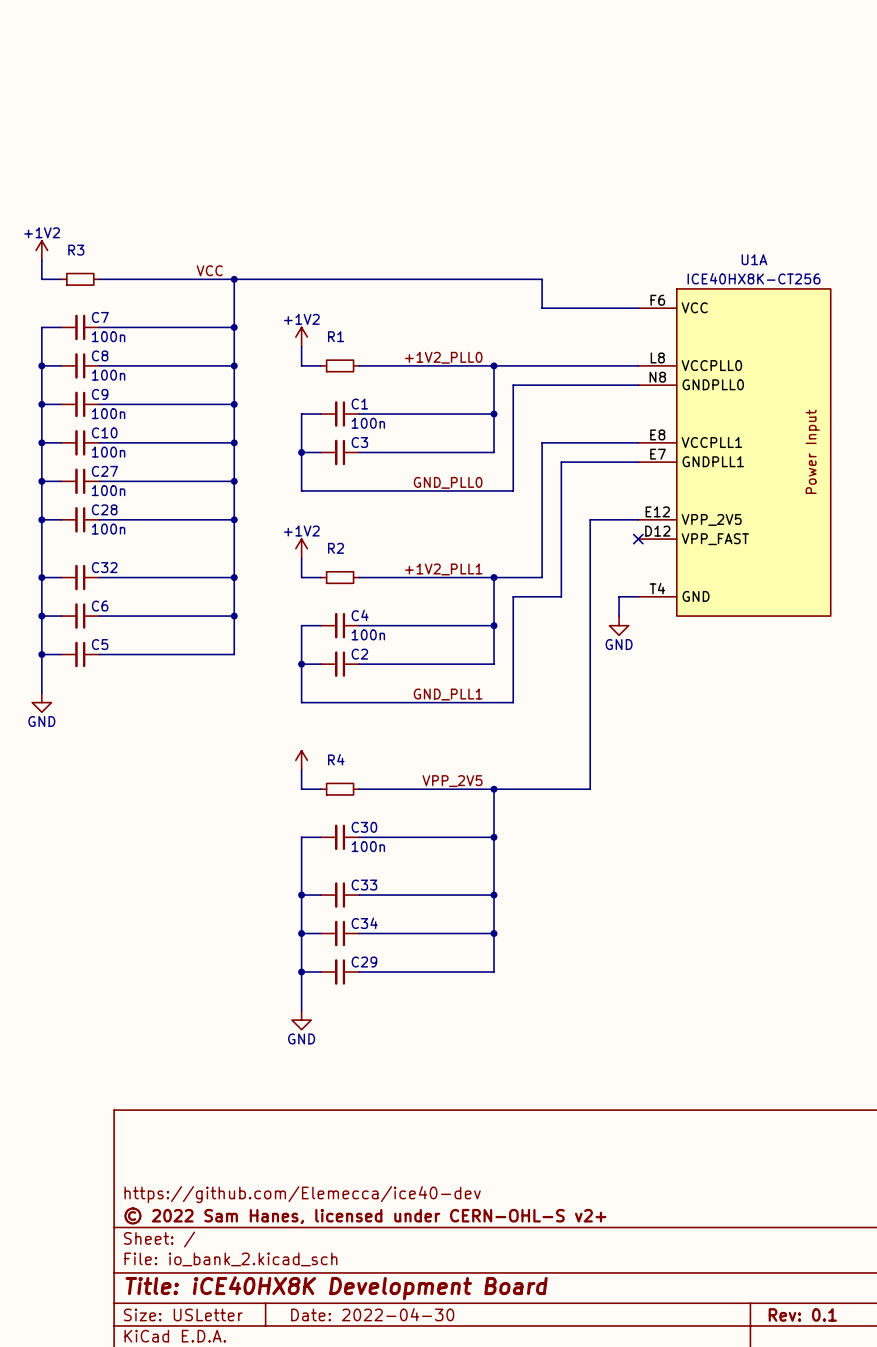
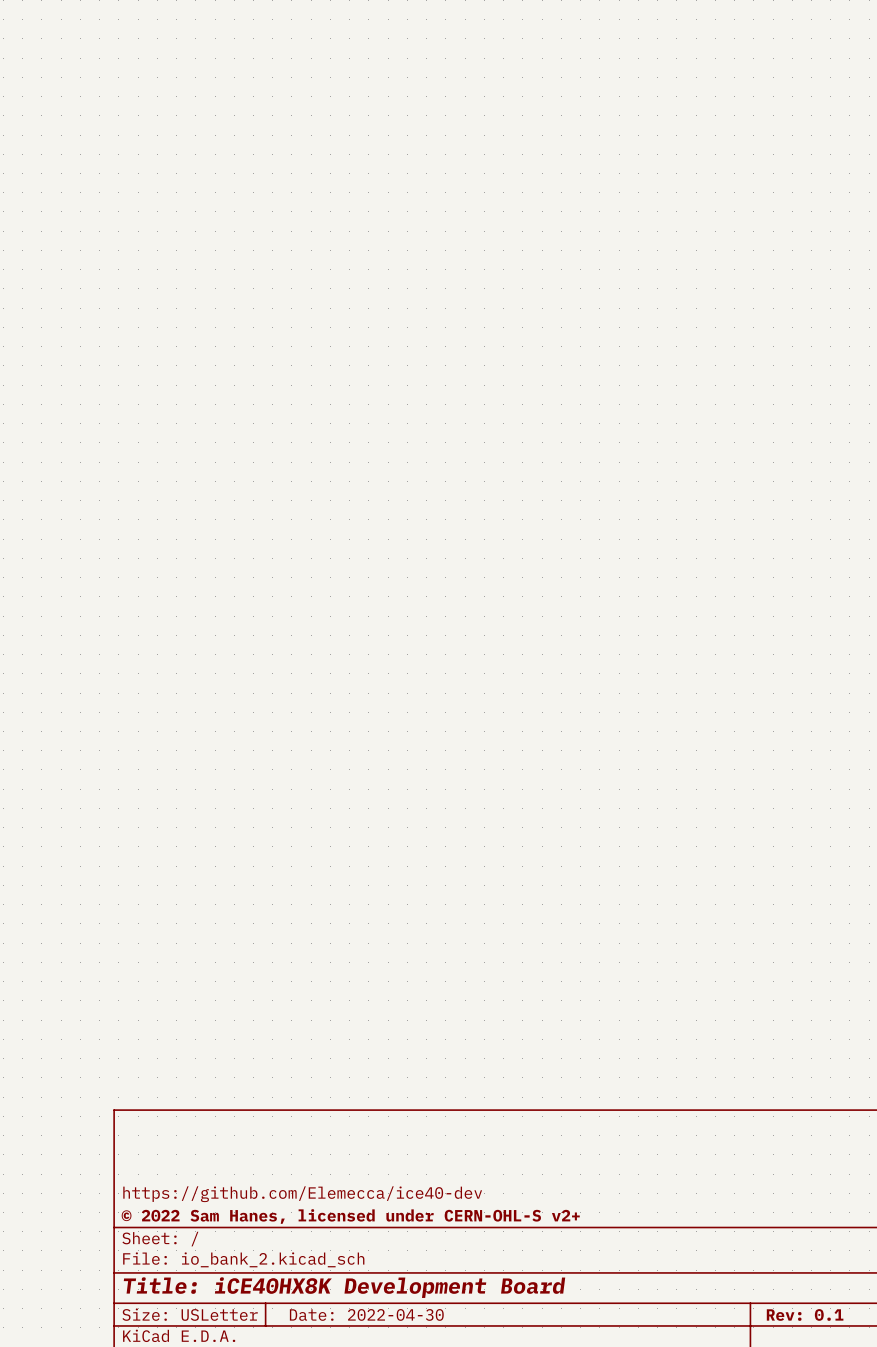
power symbol: +1V2 (41, 250) -> none
wire: (41, 260) (41, 279) (61, 279) -> none
label: VCC (209, 270) -> none
R3: (80, 279) -> none
wire: (99, 279) (542, 279) (542, 308) (638, 308) -> none
wire: (234, 279) (234, 654) (99, 654) -> none
junction: (234, 279) -> none
wire: (61, 327) (41, 327) (41, 693) -> none
C7: 100n (80, 327) -> none
wire: (99, 327) (234, 327) -> none
junction: (234, 327) -> none
power symbol: +1V2 (301, 337) -> none
wire: (301, 346) (301, 365) (320, 365) -> none
label: +1V2_PLL0 (443, 357) -> none
wire: (41, 365) (61, 365) -> none
junction: (41, 365) -> none
C8: 100n (80, 365) -> none
wire: (99, 365) (234, 365) -> none
junction: (234, 365) -> none
R1: (340, 365) -> none
wire: (359, 365) (638, 365) -> none
wire: (494, 365) (494, 452) (359, 452) -> none
junction: (494, 365) -> none
wire: (638, 385) (513, 385) (513, 490) (301, 490) (301, 414) (320, 414) -> none
wire: (41, 404) (61, 404) -> none
junction: (41, 404) -> none
C9: 100n (80, 404) -> none
wire: (99, 404) (234, 404) -> none
junction: (234, 404) -> none
C1: 100n (340, 414) -> none
wire: (359, 414) (494, 414) -> none
junction: (494, 414) -> none
wire: (41, 442) (61, 442) -> none
junction: (41, 442) -> none
C10: 100n (80, 442) -> none
wire: (99, 442) (234, 442) -> none
junction: (234, 442) -> none
wire: (638, 442) (542, 442) (542, 577) (359, 577) -> none
wire: (301, 452) (320, 452) -> none
junction: (301, 452) -> none
C3: (340, 452) -> none
U1A: ICE40HX8K-CT256 (734, 452) -> none
wire: (638, 462) (561, 462) (561, 596) (513, 596) (513, 702) (301, 702) (301, 625) (320, 625) -> none
wire: (41, 481) (61, 481) -> none
junction: (41, 481) -> none
C27: 100n (80, 481) -> none
wire: (99, 481) (234, 481) -> none
junction: (234, 481) -> none
label: GND_PLL0 (448, 482) -> none
wire: (41, 519) (61, 519) -> none
junction: (41, 519) -> none
C28: 100n (80, 519) -> none
wire: (99, 519) (234, 519) -> none
junction: (234, 519) -> none
wire: (638, 519) (590, 519) (590, 789) (359, 789) -> none
no-connect mark: (638, 539) -> none
power symbol: +1V2 (301, 548) -> none
wire: (301, 558) (301, 577) (320, 577) -> none
label: +1V2_PLL1 (443, 569) -> none
wire: (41, 577) (61, 577) -> none
junction: (41, 577) -> none
C32: (80, 577) -> none
wire: (99, 577) (234, 577) -> none
junction: (234, 577) -> none
R2: (340, 577) -> none
wire: (494, 577) (494, 664) (359, 664) -> none
junction: (494, 577) -> none
wire: (638, 596) (619, 596) (619, 616) -> none
wire: (41, 616) (61, 616) -> none
junction: (41, 616) -> none
C6: (80, 616) -> none
wire: (99, 616) (234, 616) -> none
junction: (234, 616) -> none
C4: 100n (340, 625) -> none
wire: (359, 625) (494, 625) -> none
junction: (494, 625) -> none
power symbol: GND (619, 625) -> none
wire: (41, 654) (61, 654) -> none
junction: (41, 654) -> none
C5: (80, 654) -> none
wire: (301, 664) (320, 664) -> none
junction: (301, 664) -> none
C2: (340, 664) -> none
label: GND_PLL1 (448, 694) -> none
power symbol: GND (41, 702) -> none
power symbol: (301, 760) -> none
wire: (301, 769) (301, 789) (320, 789) -> none
label: VPP_2V5 (452, 781) -> none
R4: (340, 789) -> none
wire: (494, 789) (494, 972) (359, 972) -> none
junction: (494, 789) -> none
wire: (320, 837) (301, 837) (301, 1010) -> none
C30: 100n (340, 837) -> none
wire: (359, 837) (494, 837) -> none
junction: (494, 837) -> none
wire: (301, 895) (320, 895) -> none
junction: (301, 895) -> none
C33: (340, 895) -> none
wire: (359, 895) (494, 895) -> none
junction: (494, 895) -> none
wire: (301, 933) (320, 933) -> none
junction: (301, 933) -> none
C34: (340, 933) -> none
wire: (359, 933) (494, 933) -> none
junction: (494, 933) -> none
wire: (301, 972) (320, 972) -> none
junction: (301, 972) -> none
C29: (340, 972) -> none
power symbol: GND (301, 1020) -> none

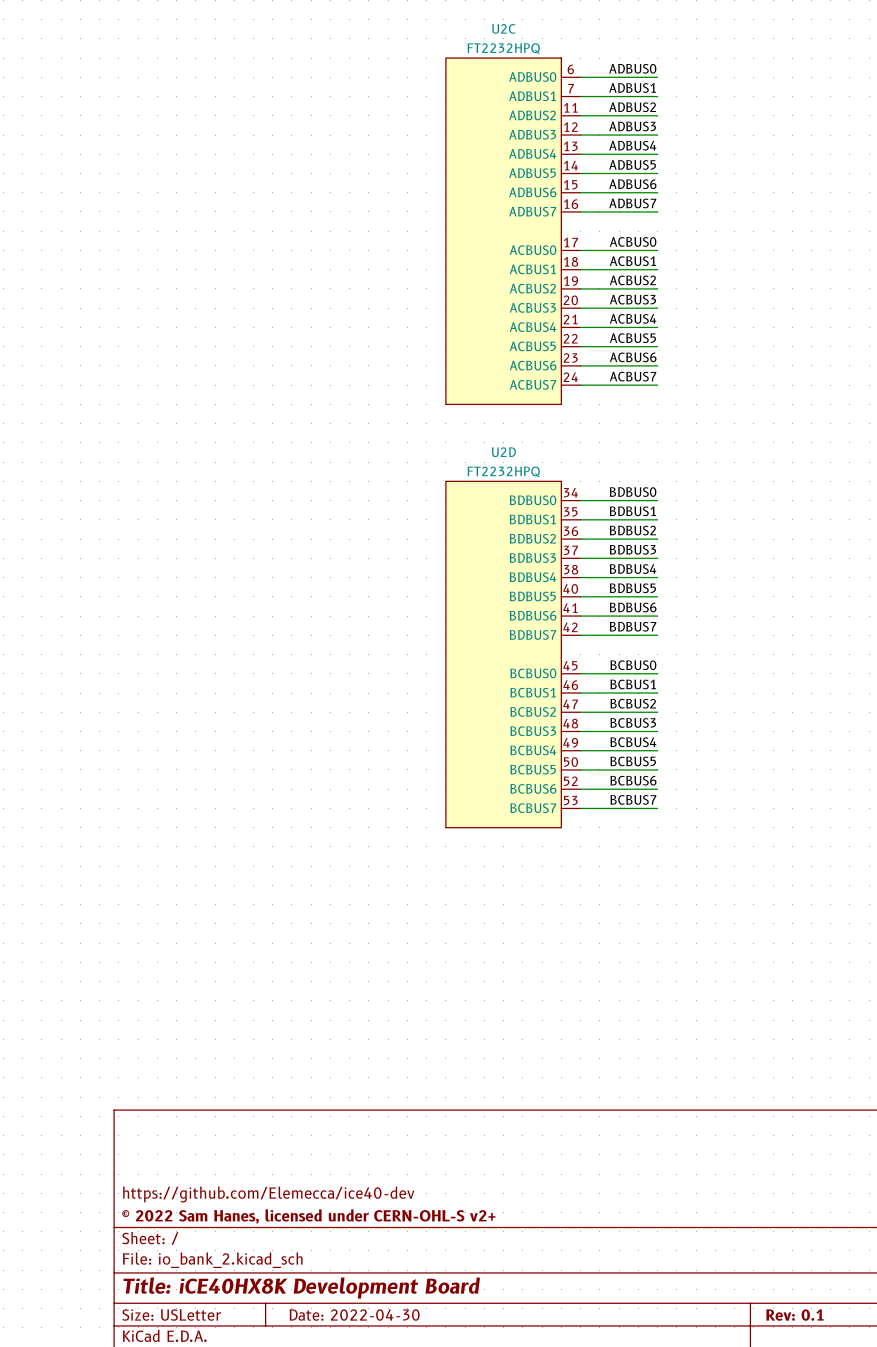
label: none -> ADBUS0 (632, 68)
wire: none -> (580, 77) (657, 77)
label: none -> ADBUS1 (632, 88)
wire: none -> (580, 96) (657, 96)
label: none -> ADBUS2 (632, 107)
wire: none -> (580, 115) (657, 115)
label: none -> ADBUS3 (632, 126)
wire: none -> (580, 135) (657, 135)
label: none -> ADBUS4 (632, 145)
wire: none -> (580, 154) (657, 154)
label: none -> ADBUS5 (632, 164)
wire: none -> (580, 173) (657, 173)
label: none -> ADBUS6 (632, 184)
wire: none -> (580, 192) (657, 192)
label: none -> ADBUS7 (632, 203)
wire: none -> (580, 211) (657, 211)
U2C: none -> FT2232HPQ (513, 231)
label: none -> ACBUS0 (633, 241)
wire: none -> (580, 250) (657, 250)
label: none -> ACBUS1 (632, 261)
wire: none -> (580, 269) (657, 269)
label: none -> ACBUS2 (632, 280)
wire: none -> (580, 288) (657, 288)
label: none -> ACBUS3 (632, 299)
wire: none -> (580, 308) (657, 308)
label: none -> ACBUS4 (633, 318)
wire: none -> (580, 327) (657, 327)
label: none -> ACBUS5 (632, 338)
wire: none -> (580, 346) (657, 346)
label: none -> ACBUS6 (633, 357)
wire: none -> (580, 365) (657, 365)
label: none -> ACBUS7 (633, 376)
wire: none -> (580, 385) (657, 385)
label: none -> BDBUS0 (633, 492)
wire: none -> (580, 500) (657, 500)
label: none -> BDBUS1 (632, 511)
wire: none -> (580, 519) (657, 519)
label: none -> BDBUS2 (632, 530)
wire: none -> (580, 539) (657, 539)
label: none -> BDBUS3 (632, 549)
wire: none -> (580, 558) (657, 558)
label: none -> BDBUS4 (633, 569)
wire: none -> (580, 577) (657, 577)
label: none -> BDBUS5 (632, 588)
wire: none -> (580, 596) (657, 596)
label: none -> BDBUS6 (633, 607)
wire: none -> (580, 616) (657, 616)
label: none -> BDBUS7 (633, 626)
wire: none -> (580, 635) (657, 635)
U2D: none -> FT2232HPQ (513, 654)
label: none -> BCBUS0 (633, 665)
wire: none -> (580, 673) (657, 673)
label: none -> BCBUS1 (633, 684)
wire: none -> (580, 693) (657, 693)
label: none -> BCBUS2 (633, 703)
wire: none -> (580, 712) (657, 712)
label: none -> BCBUS3 (633, 722)
wire: none -> (580, 731) (657, 731)
label: none -> BCBUS4 (633, 742)
wire: none -> (580, 750) (657, 750)
label: none -> BCBUS5 (633, 761)
wire: none -> (580, 769) (657, 769)
label: none -> BCBUS6 (633, 780)
wire: none -> (580, 789) (657, 789)
label: none -> BCBUS7 (633, 799)
wire: none -> (580, 808) (657, 808)

